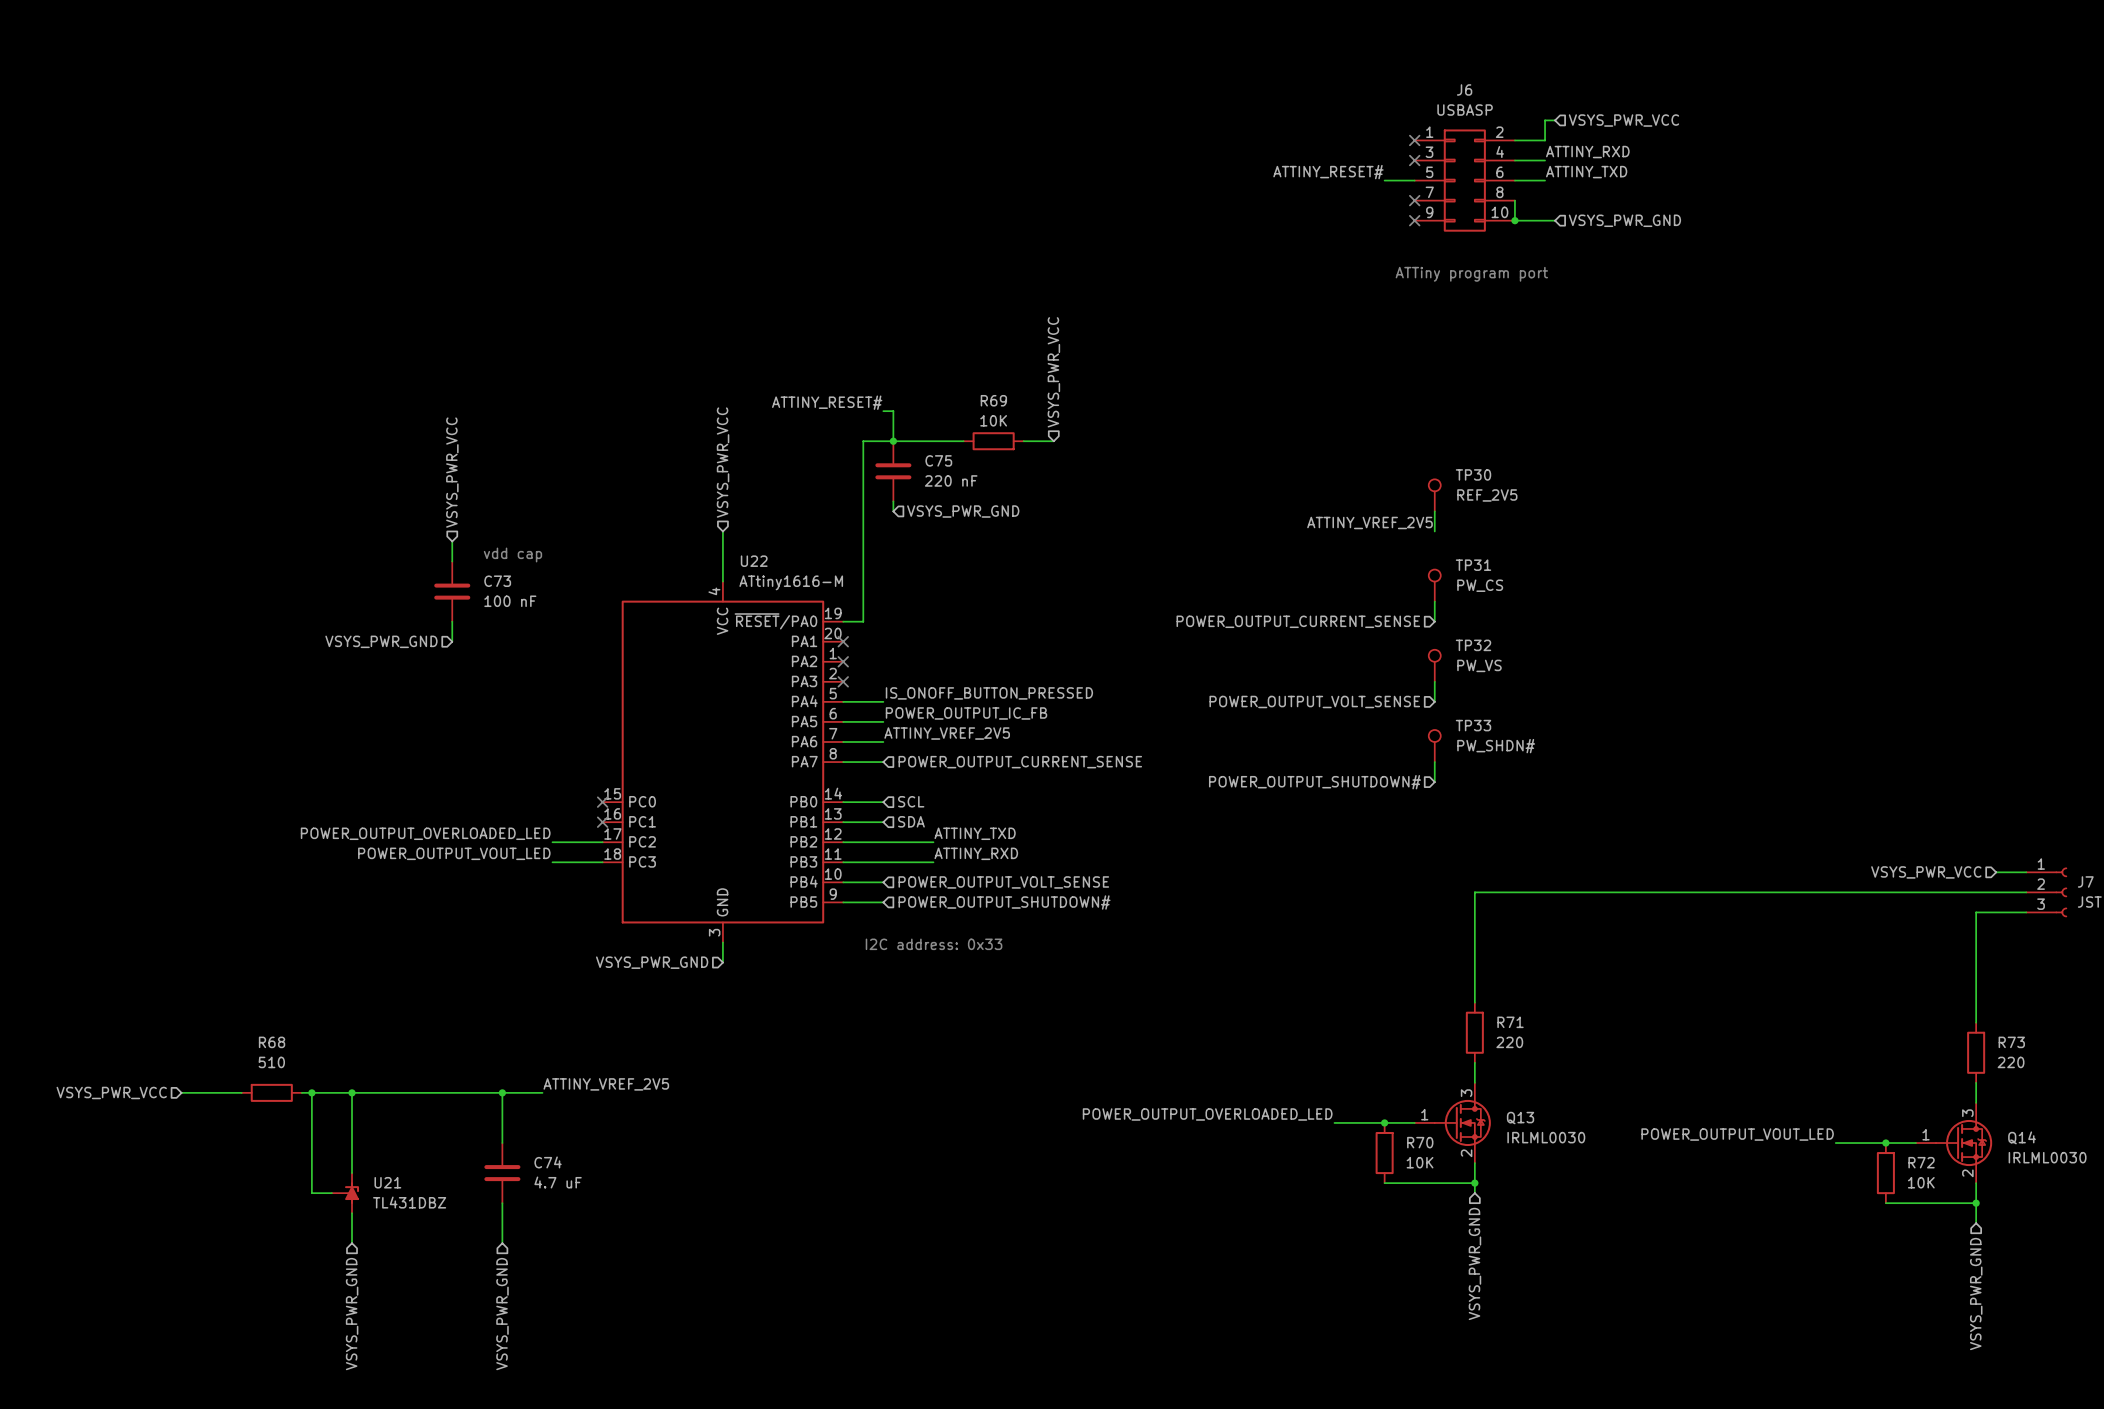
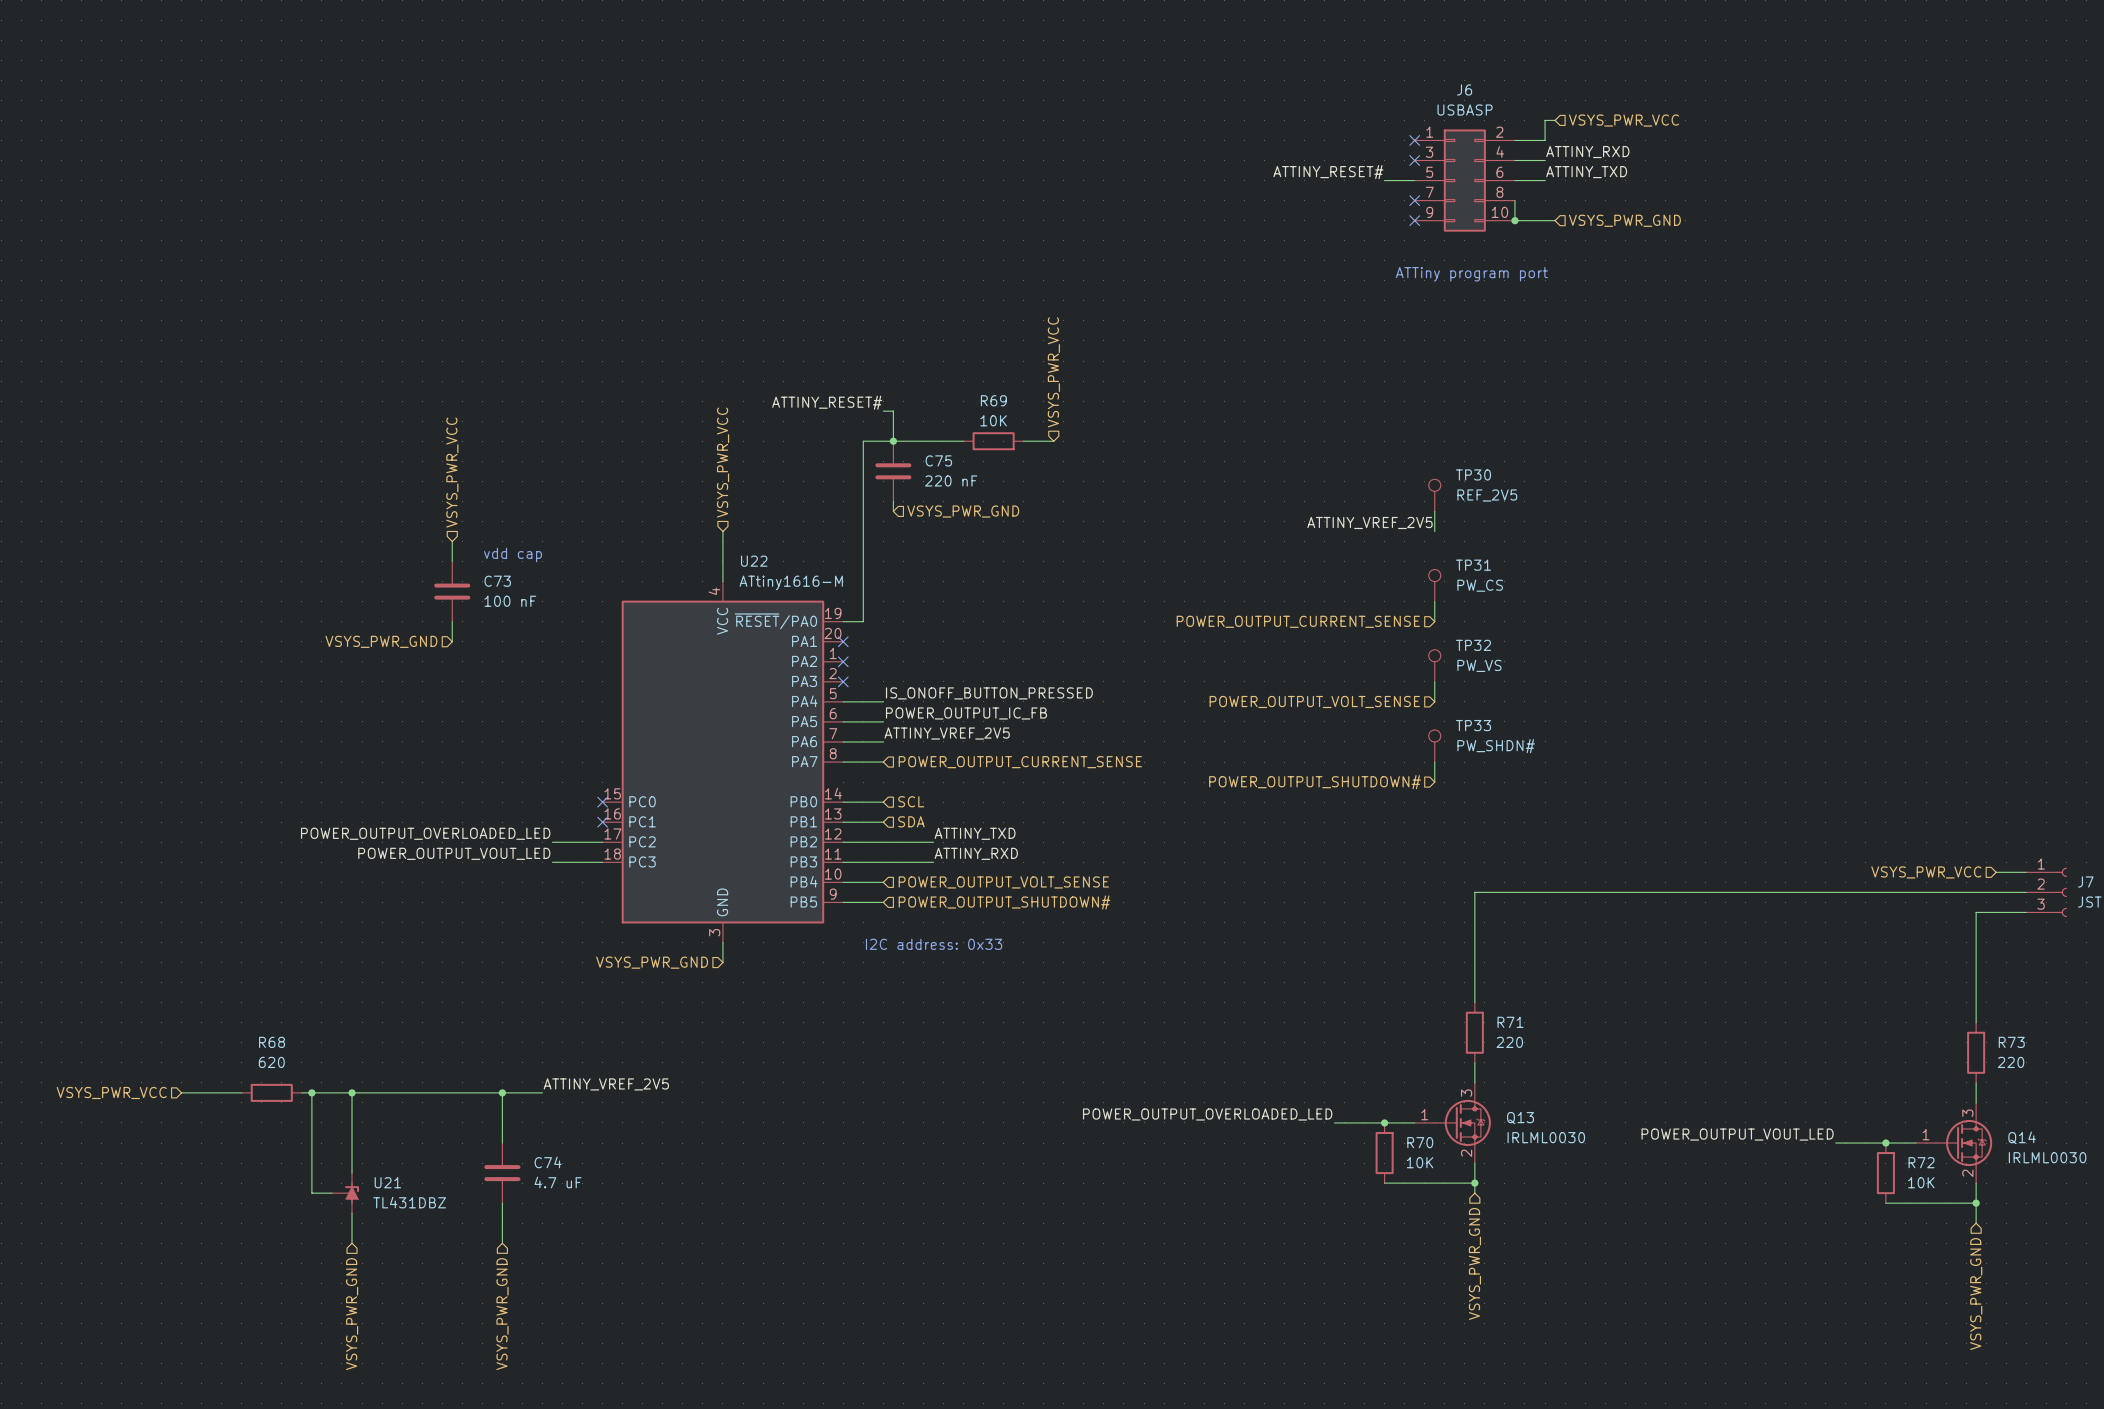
R68 value: 510 (271, 1062) -> 620 (271, 1062)

